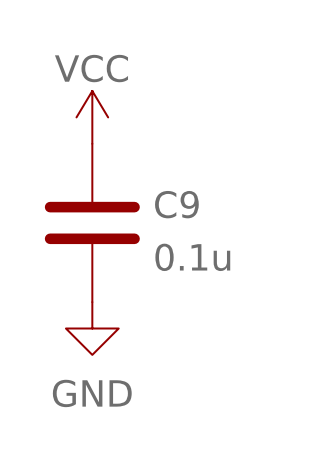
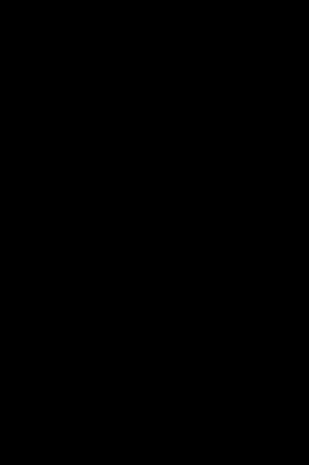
power symbol: VCC (92, 117) -> none
C9: 0.1u (92, 222) -> none
power symbol: GND (92, 328) -> none

